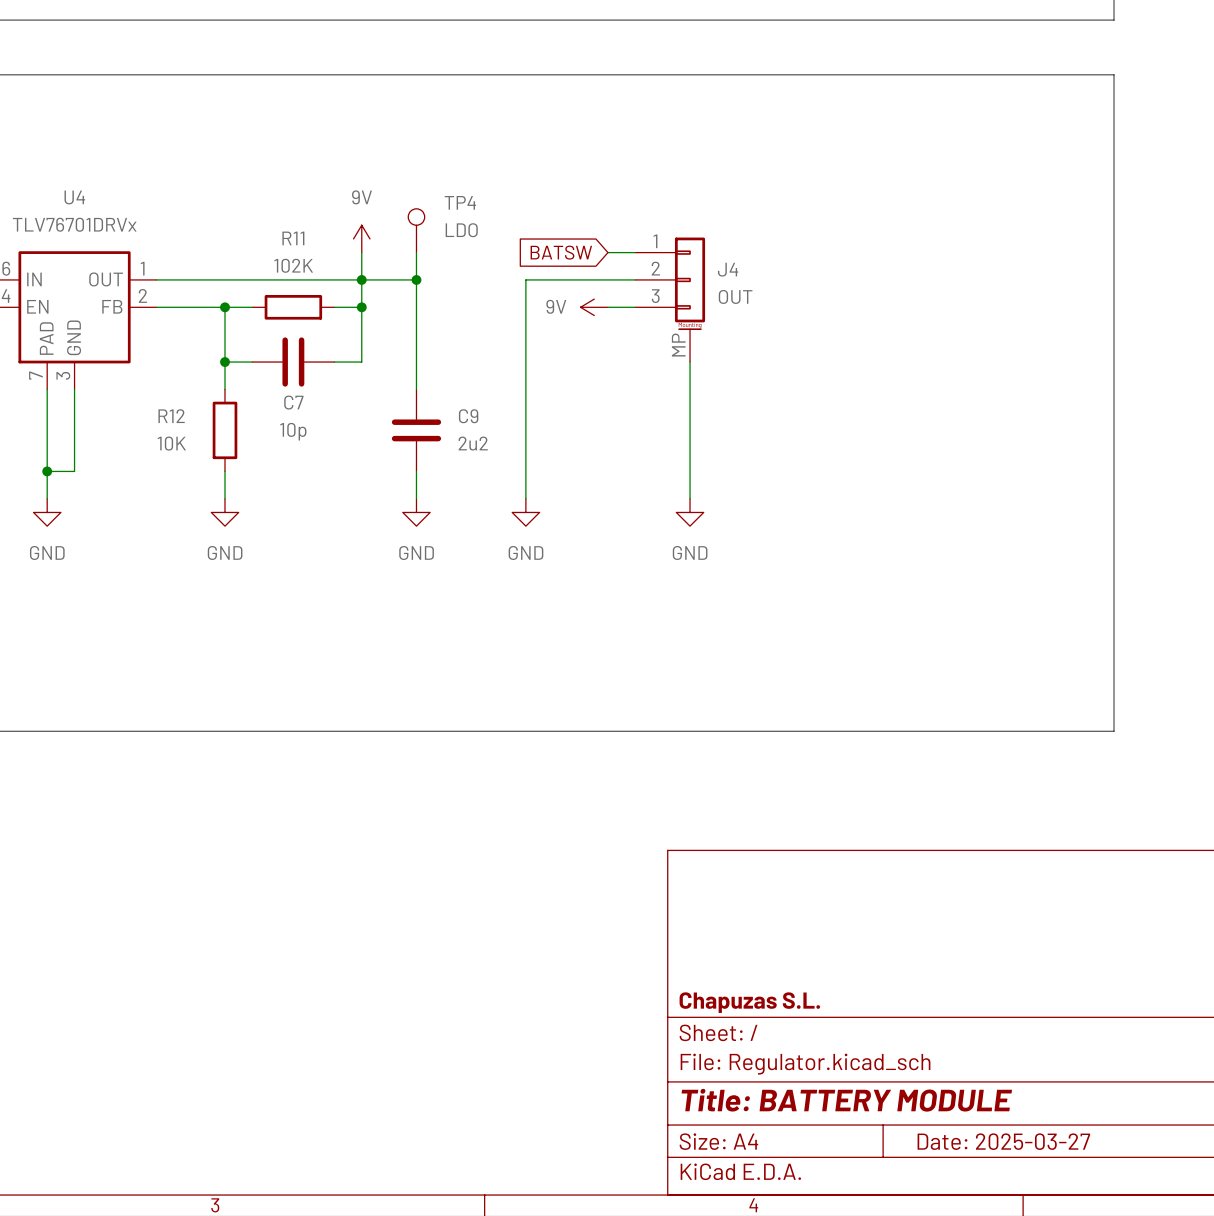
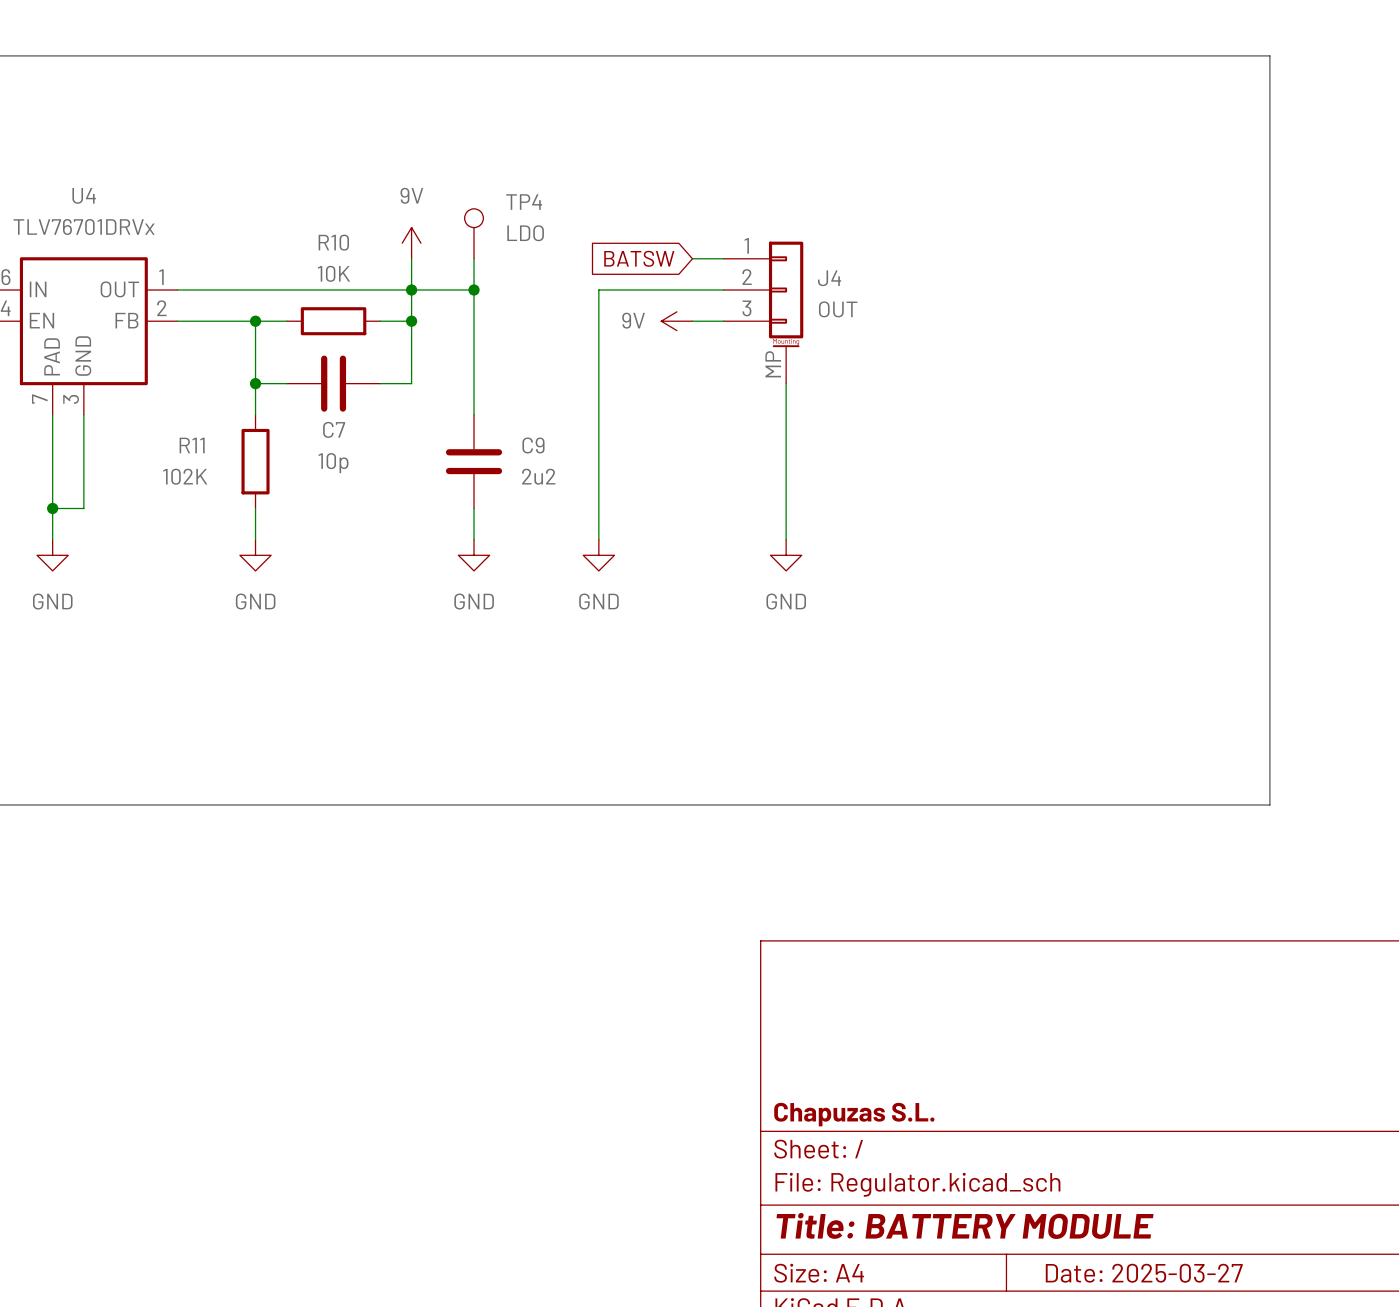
R11 name: R11 (293, 238) -> R10 (333, 242)
R11 value: 102K (293, 265) -> 10K (333, 273)
R12 name: R12 (171, 416) -> R11 (192, 445)
R12 value: 10K (171, 443) -> 102K (185, 476)

